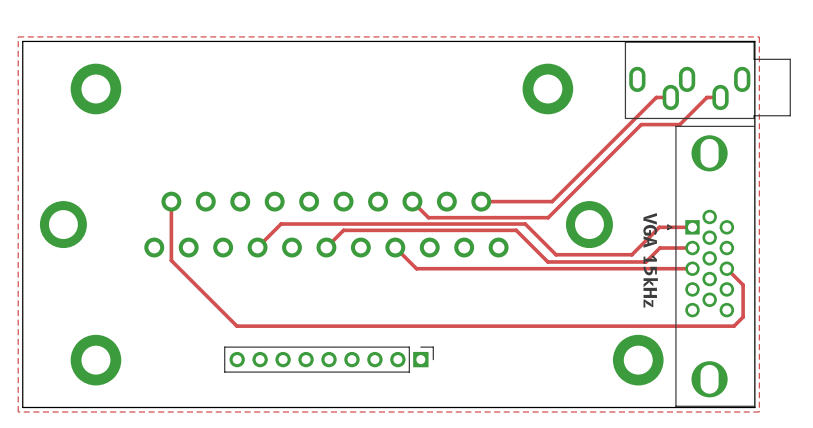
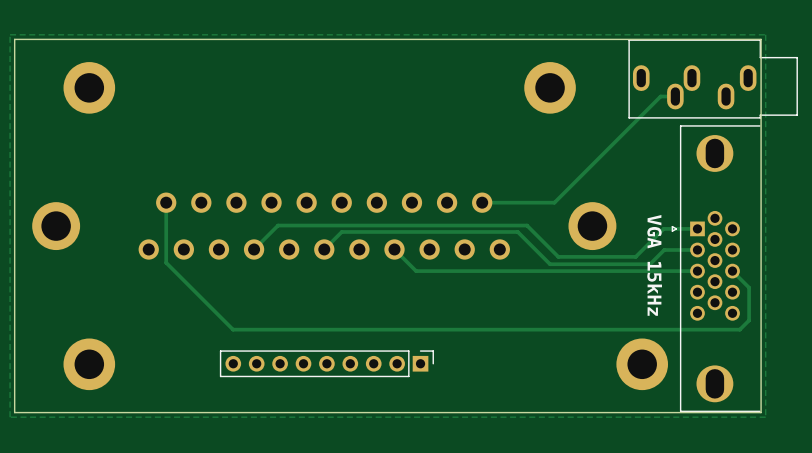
track: (720, 97) (706, 97) (679, 124) (641, 124) (548, 217) (428, 217) (412, 201) -> none

